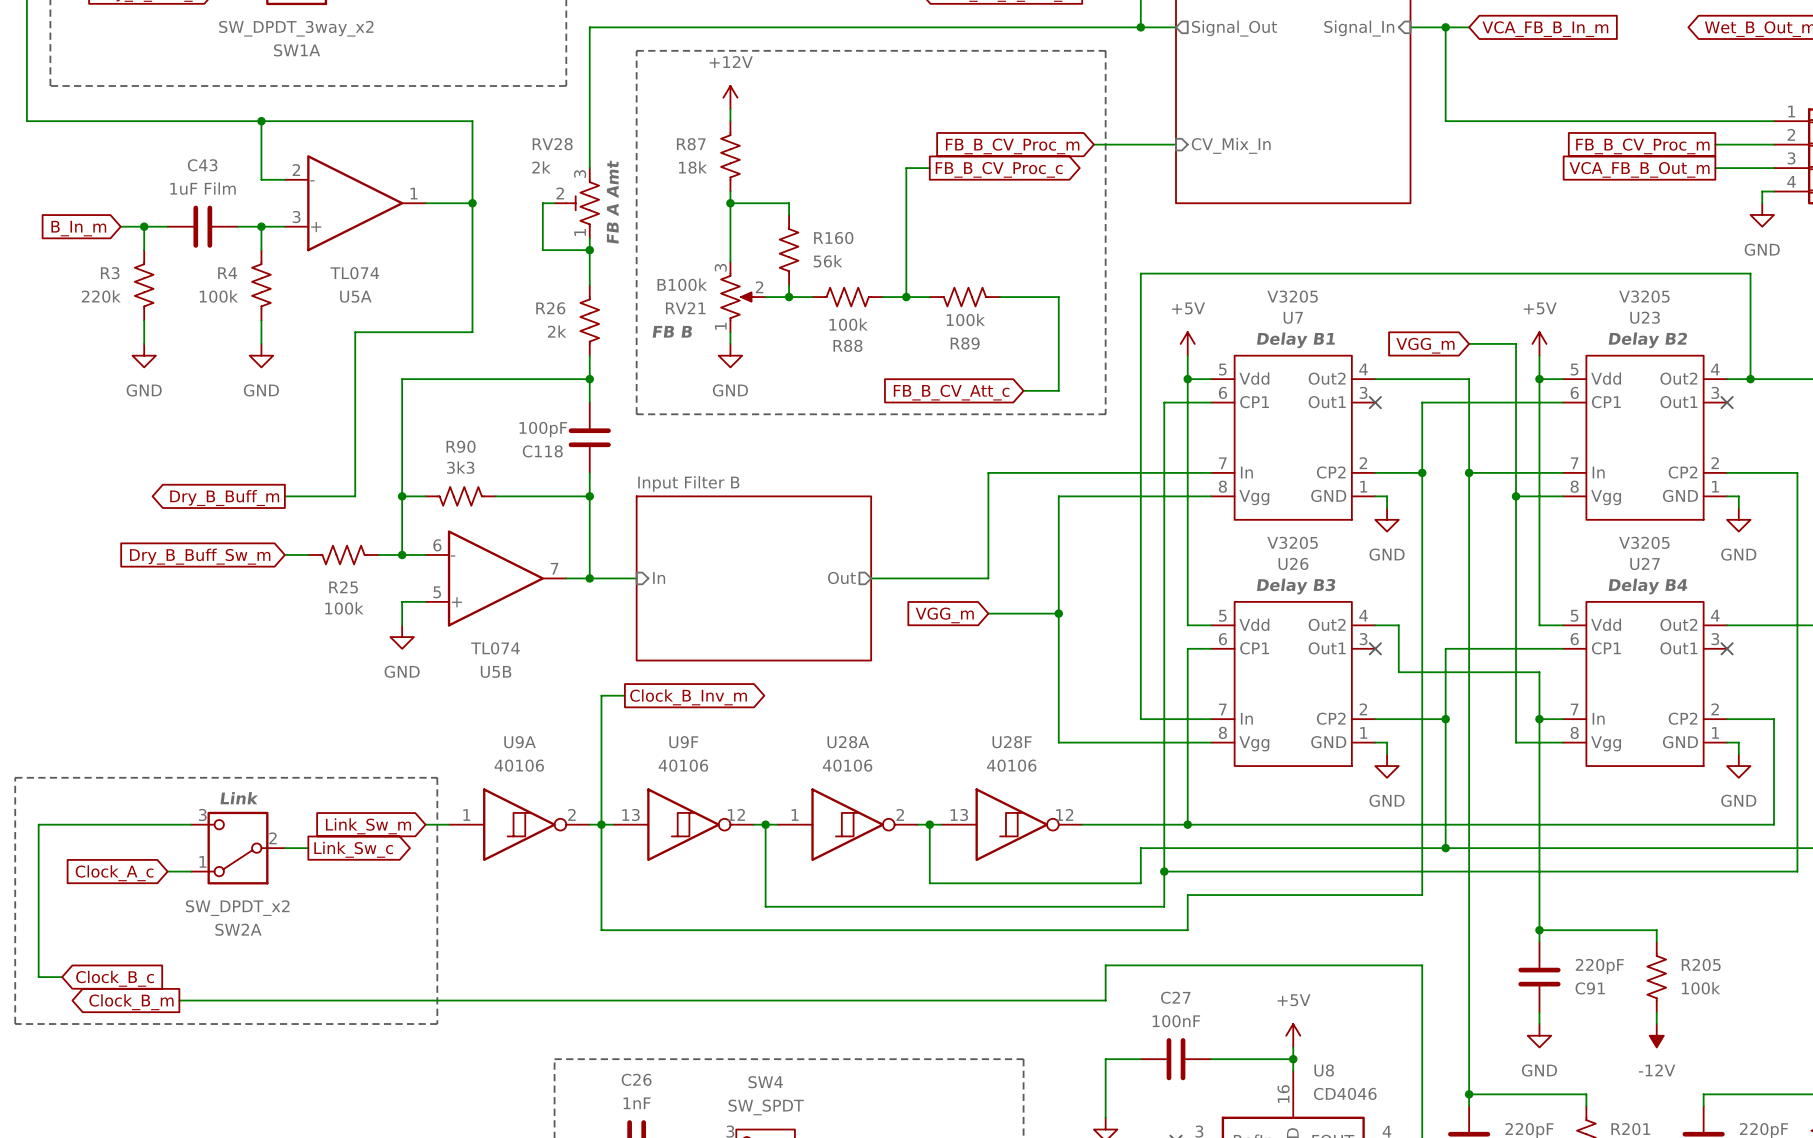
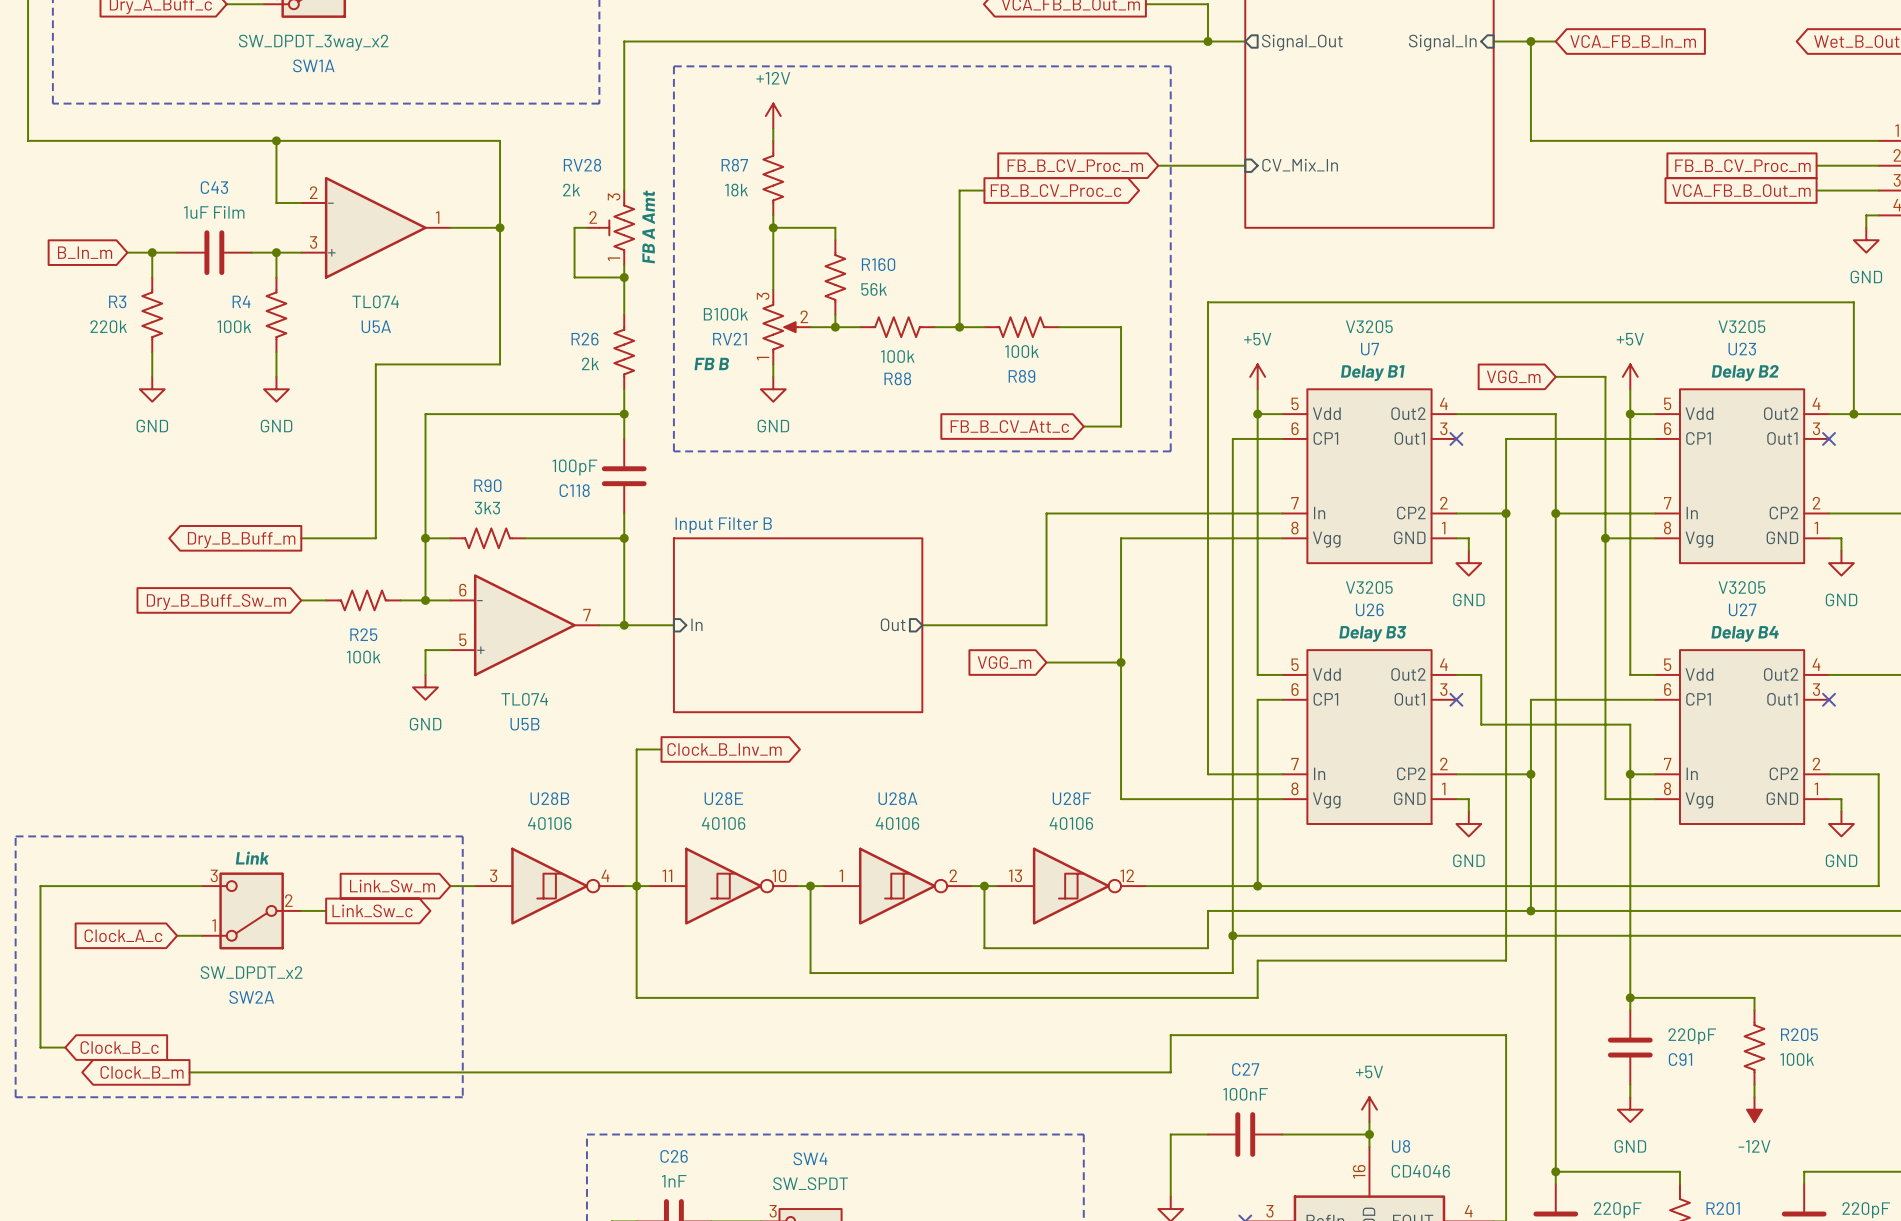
U9A name: U9A (520, 742) -> U28B (549, 798)
U9F name: U9F (683, 742) -> U28E (723, 798)
U9A pin number: 2 (571, 814) -> 4 (605, 875)
U9F pin number: 12 (736, 814) -> 10 (779, 875)
U9A pin number: 1 (466, 815) -> 3 (493, 875)
U9F pin number: 13 (631, 815) -> 11 (667, 875)

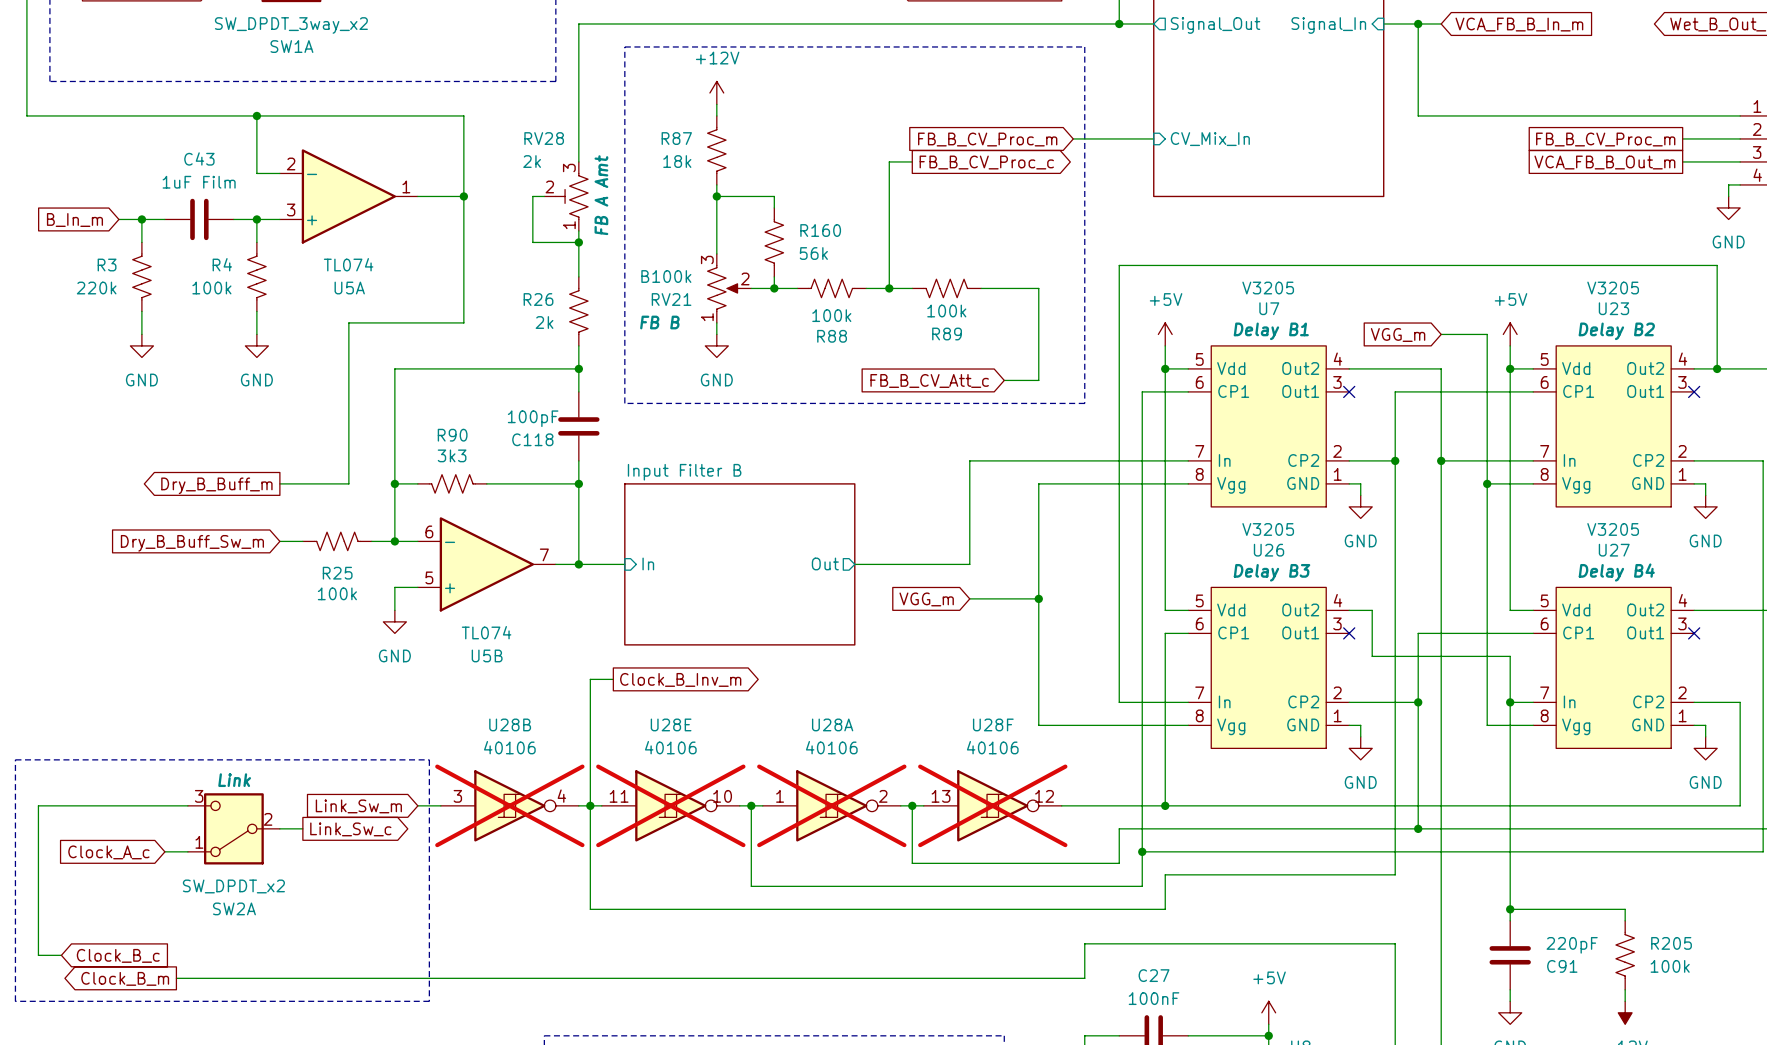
U28B do-not-place cross: none -> (509, 805)
U28E do-not-place cross: none -> (670, 805)
U28A do-not-place cross: none -> (831, 805)
U28F do-not-place cross: none -> (992, 805)

